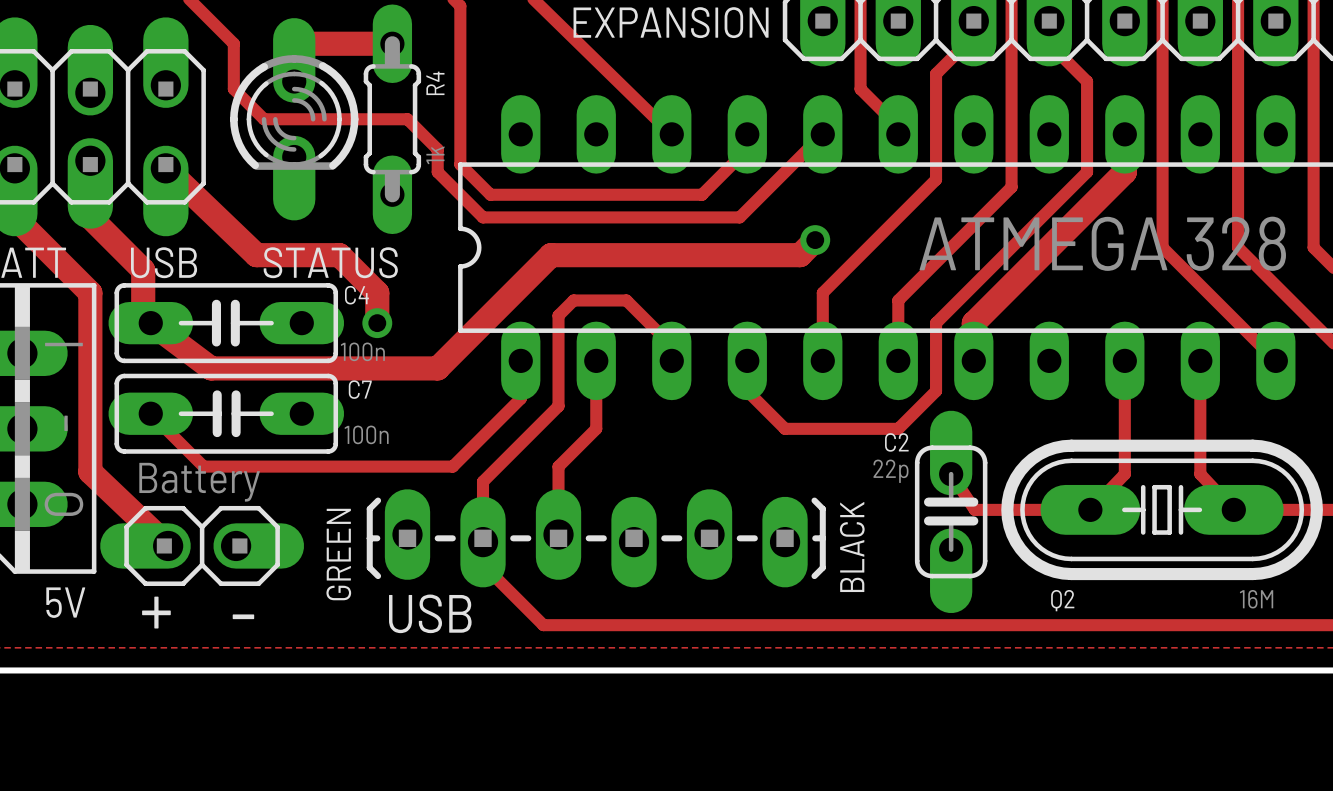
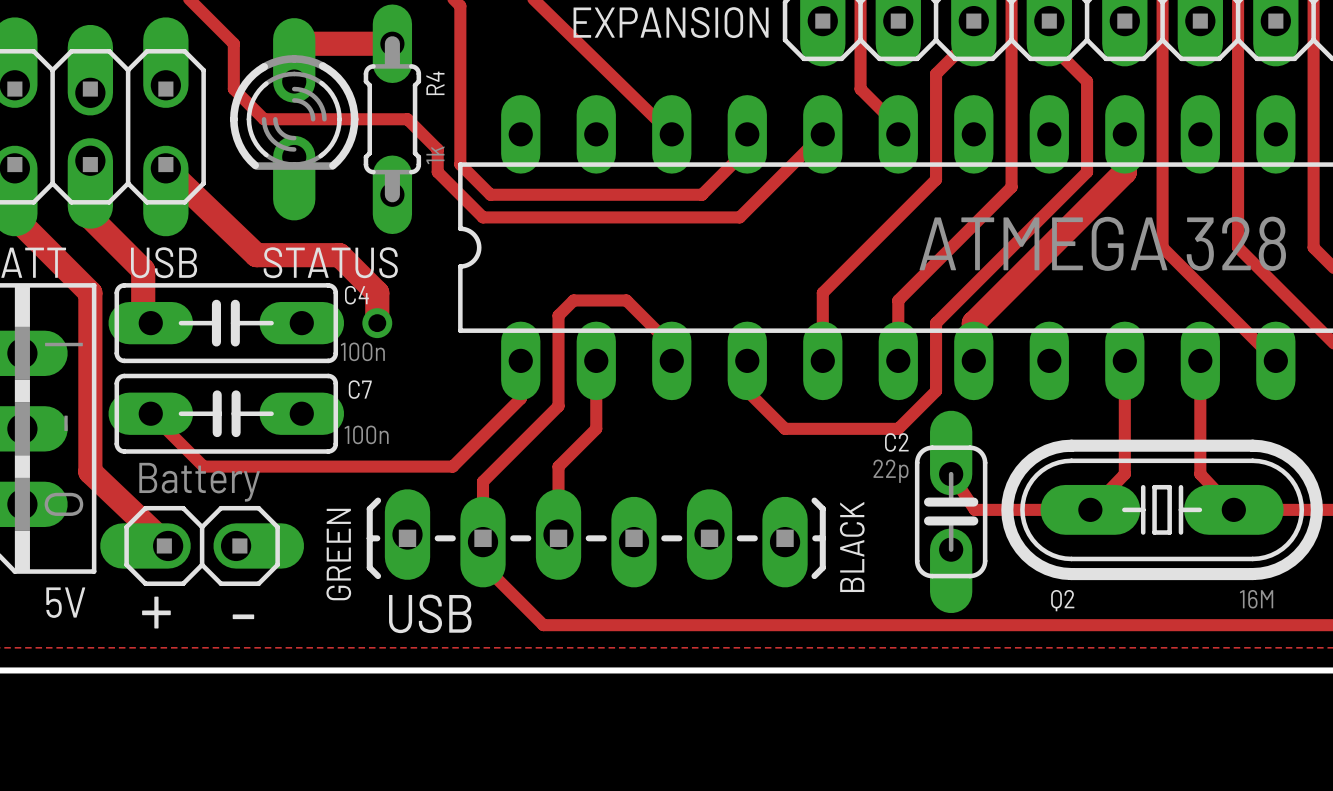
track: (815, 240) (800, 255) (550, 255) (437, 368) (211, 368) (150, 323) -> none
via: (815, 240) -> none

